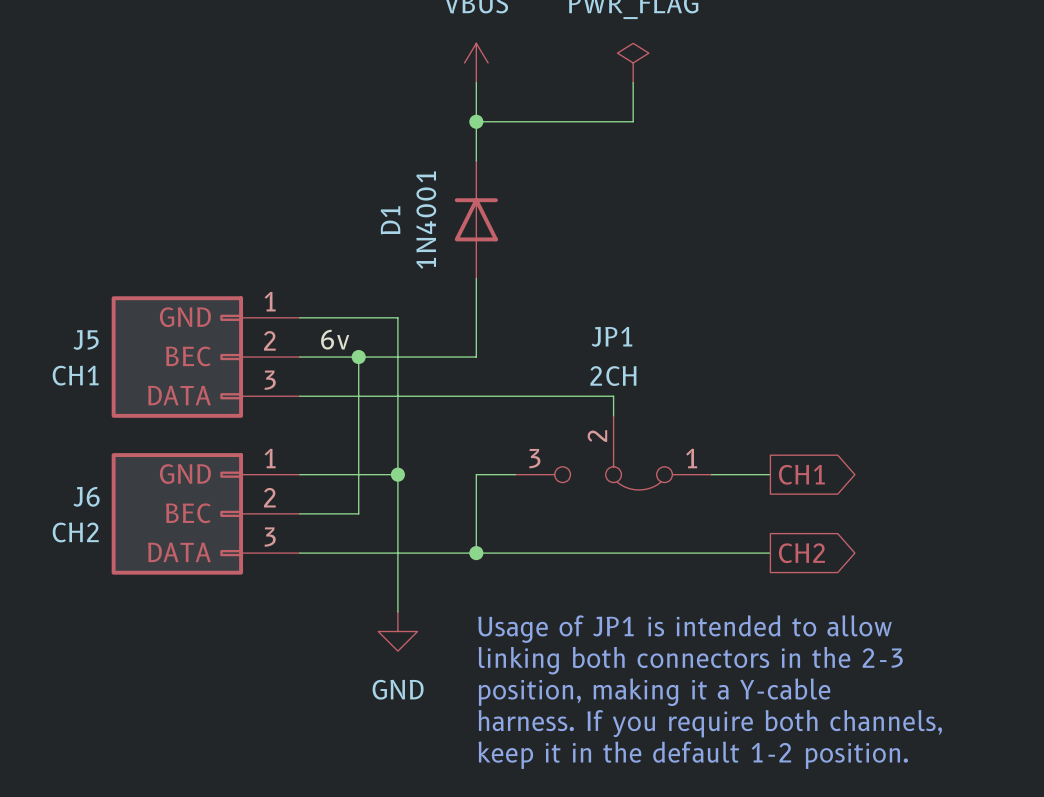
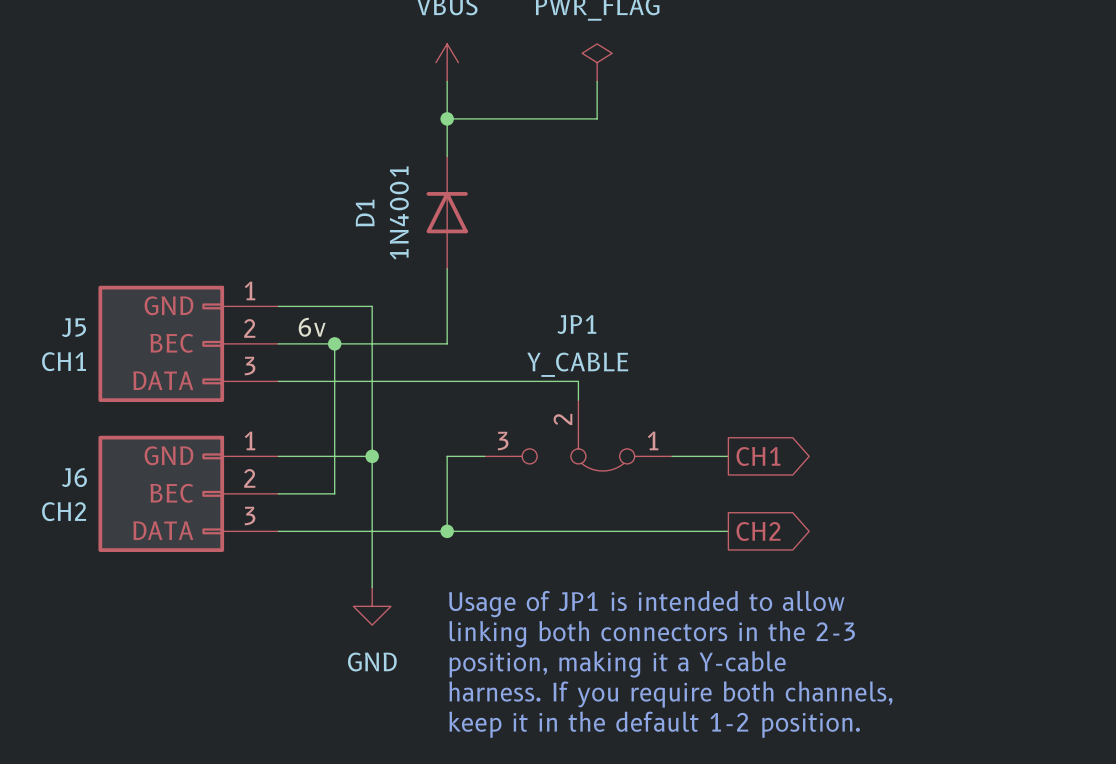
JP1 value: 2CH (613, 376) -> Y_CABLE (577, 364)

